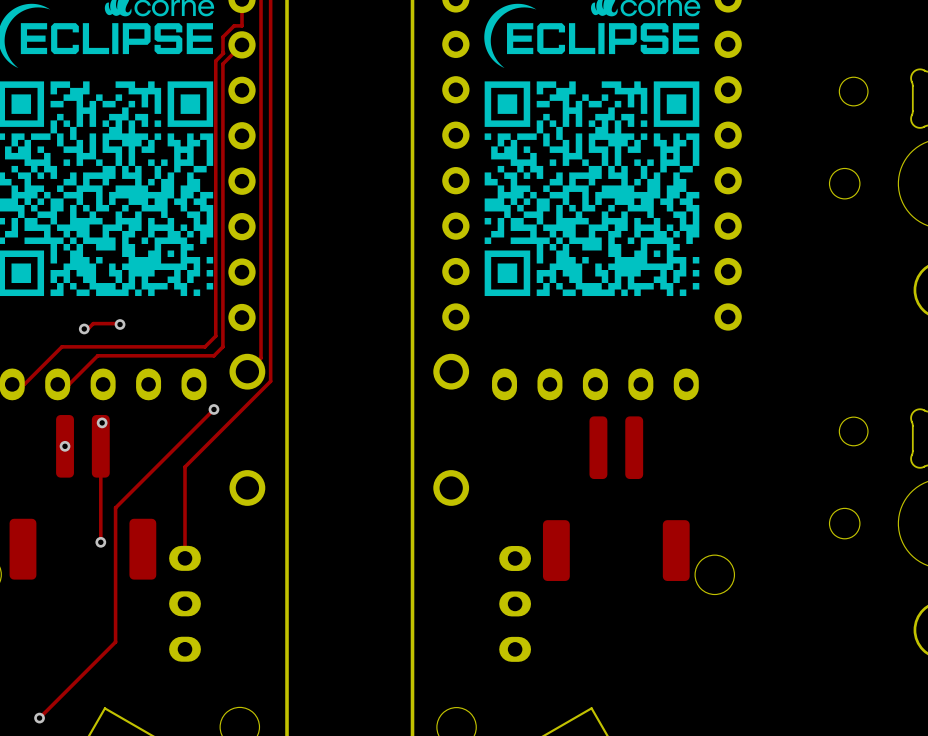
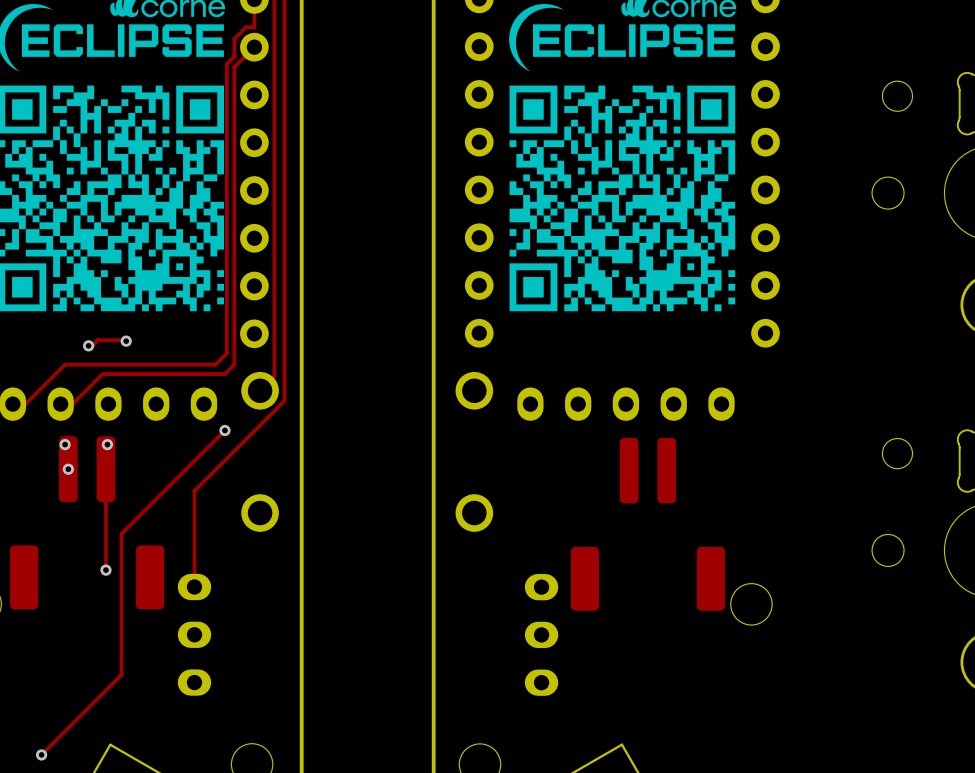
via: none -> (65, 444)

